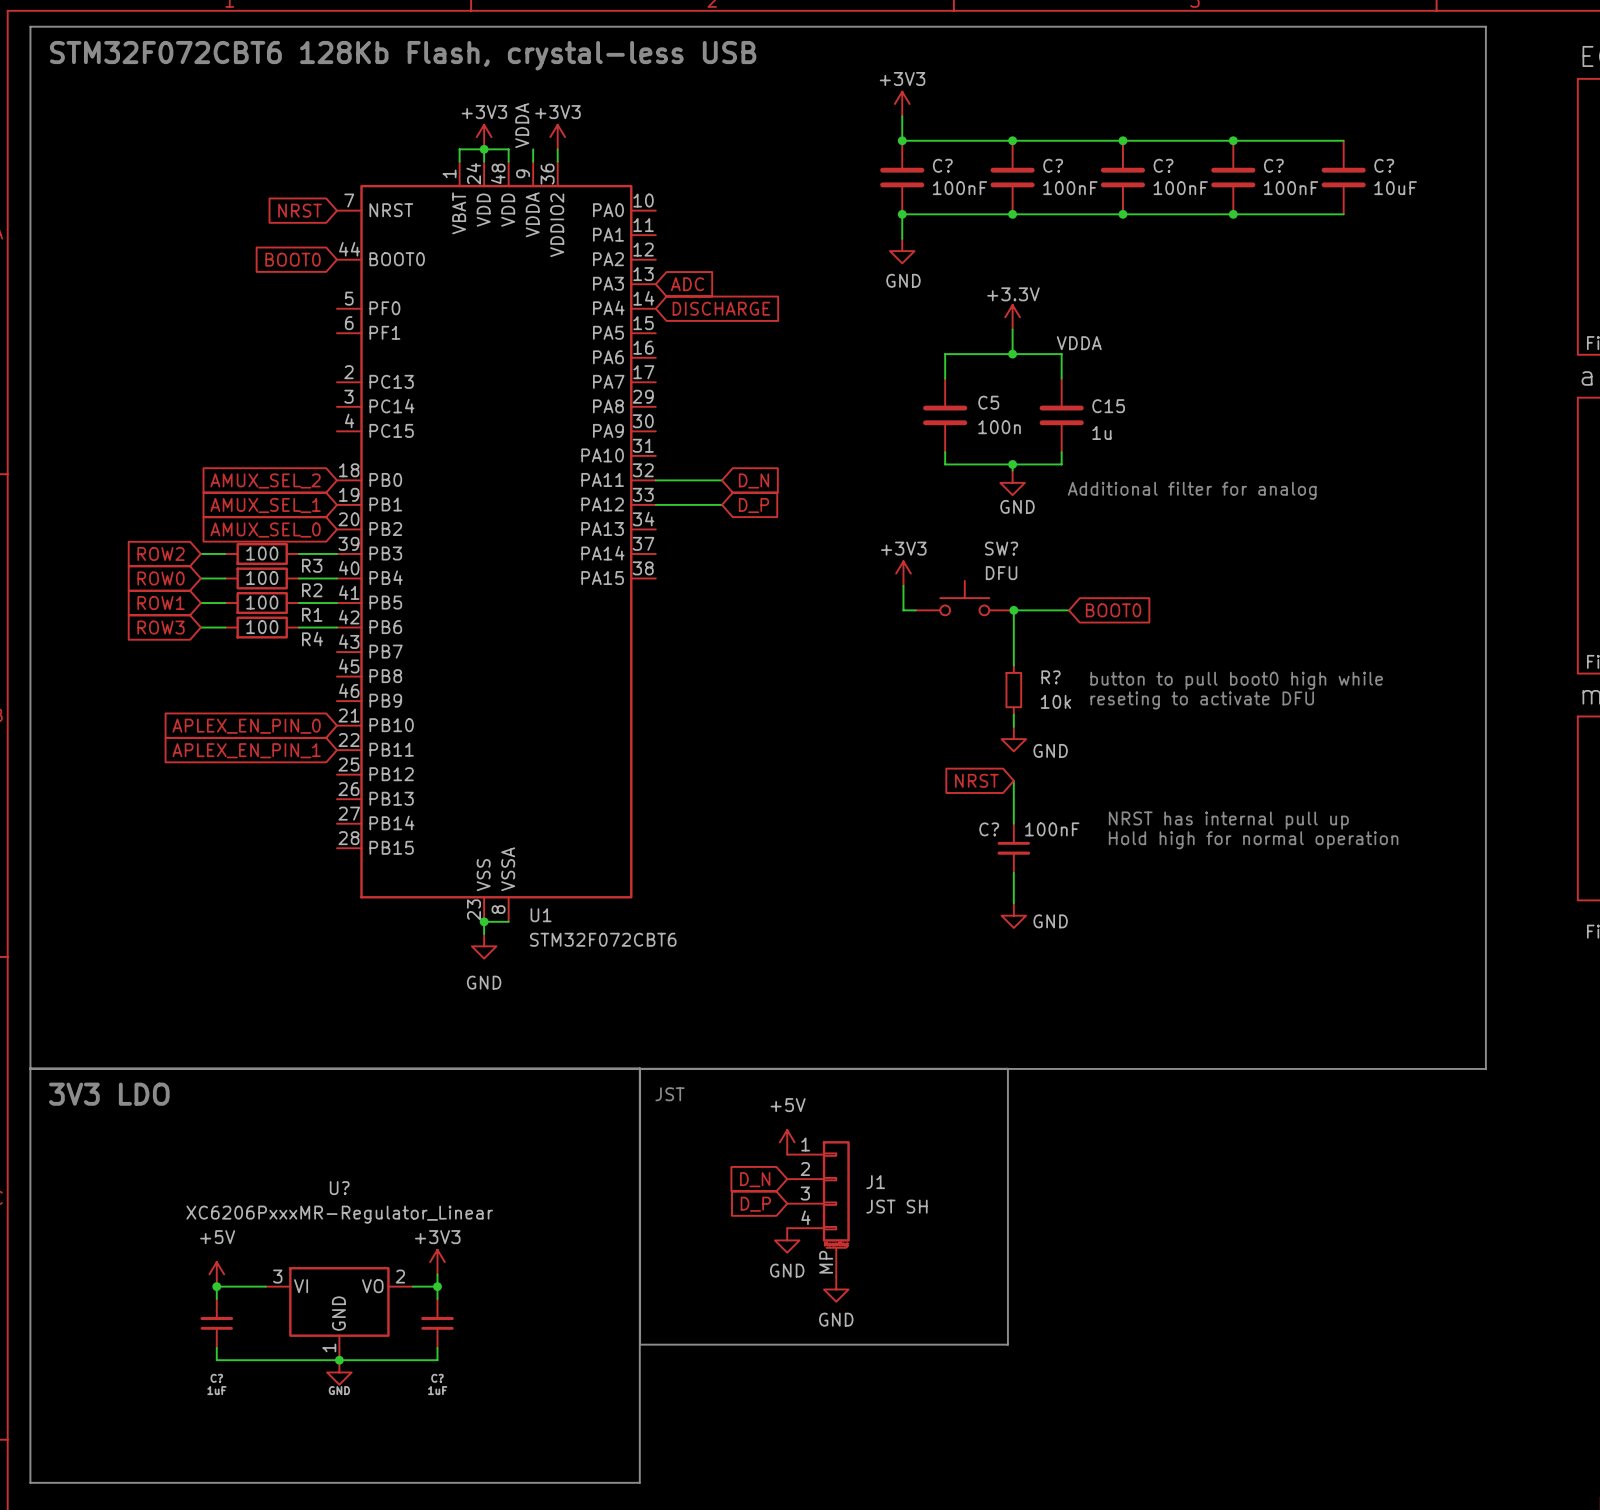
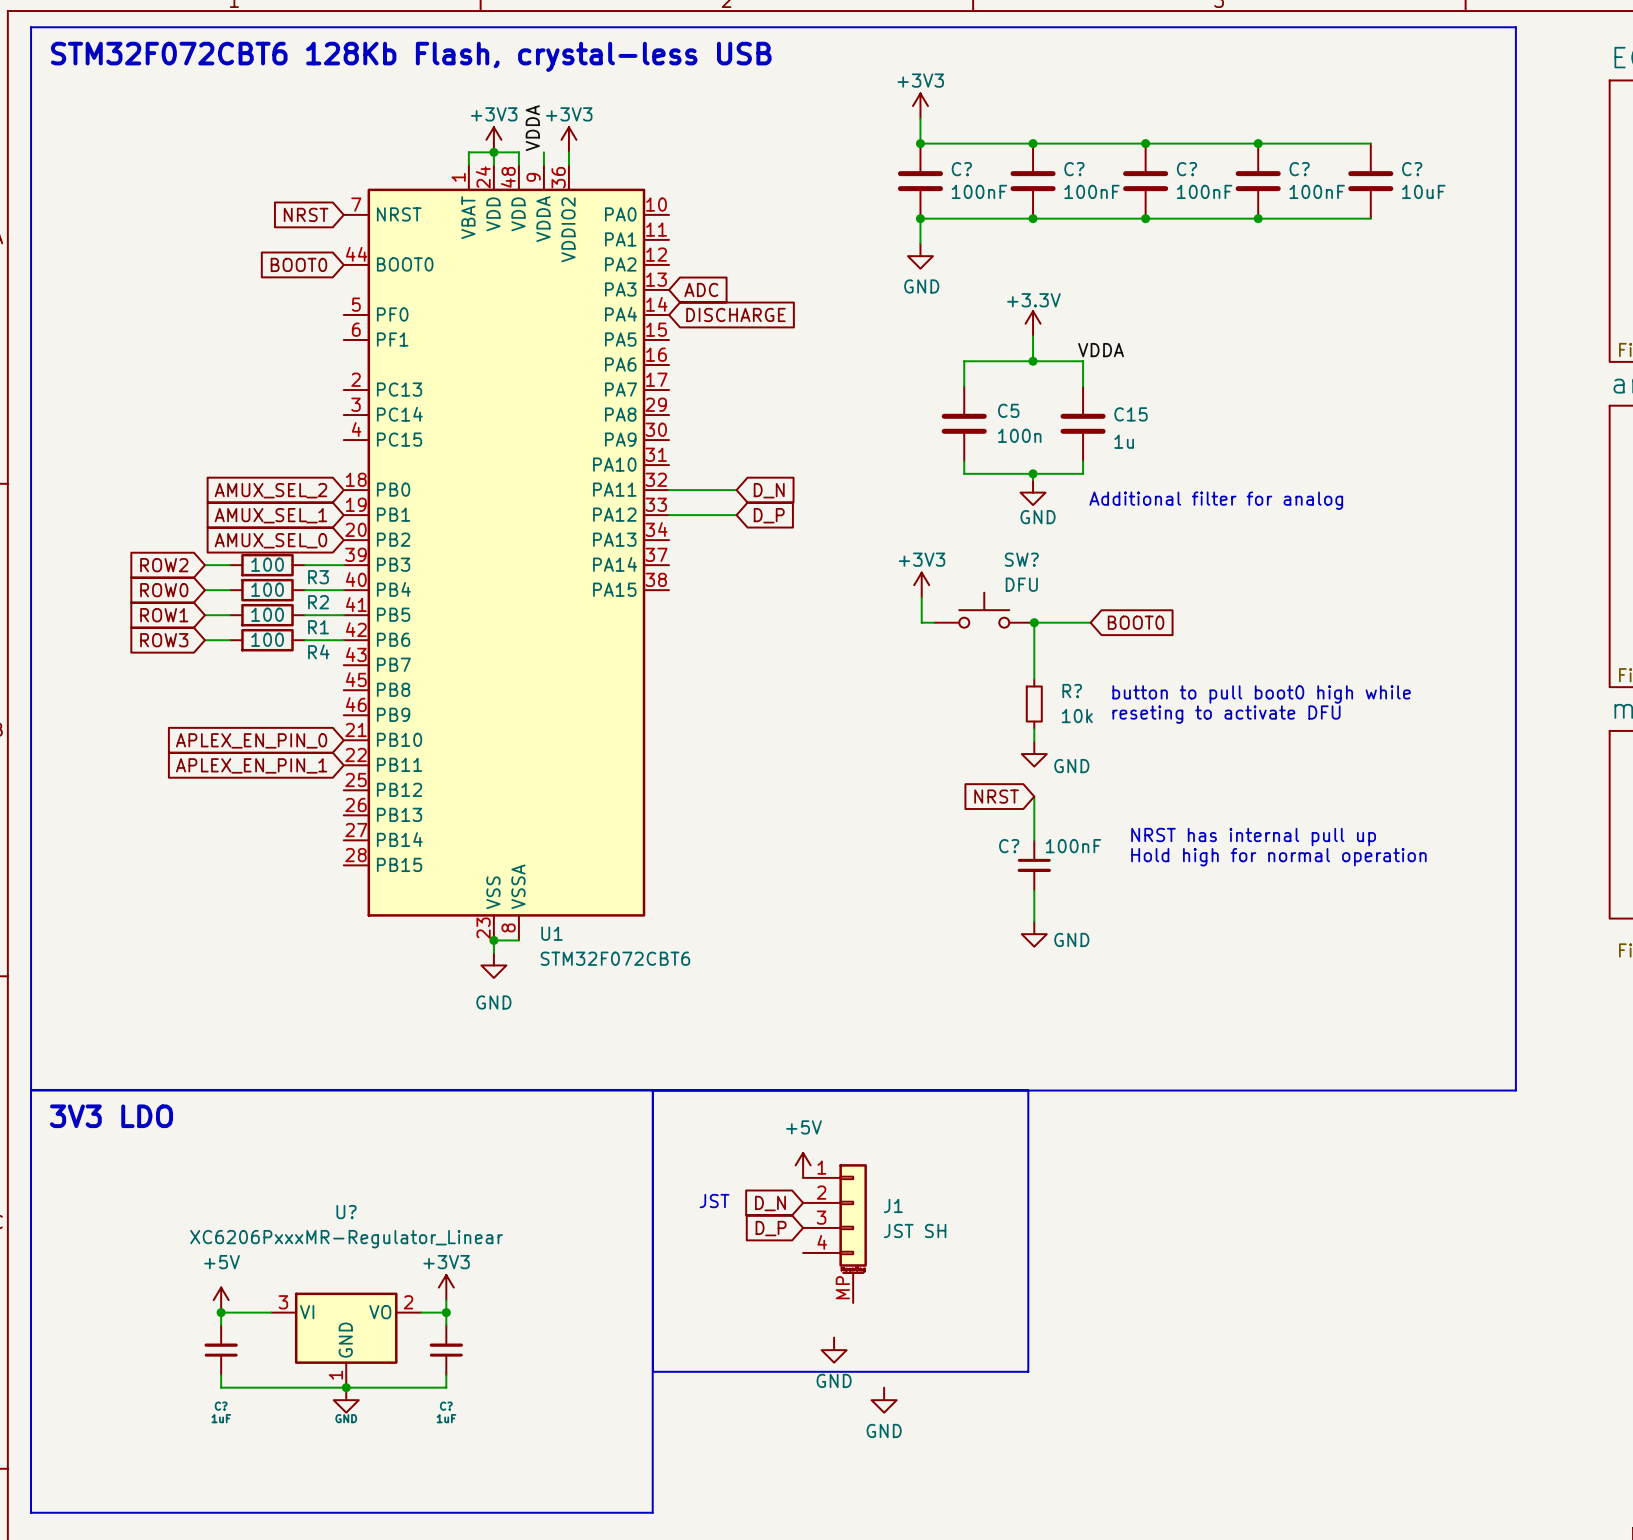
text position: JST (670, 1094) -> JST (714, 1201)
power symbol: GND (787, 1240) -> none
power symbol position: GND (836, 1289) -> GND (834, 1350)
power symbol: none -> GND (884, 1400)

